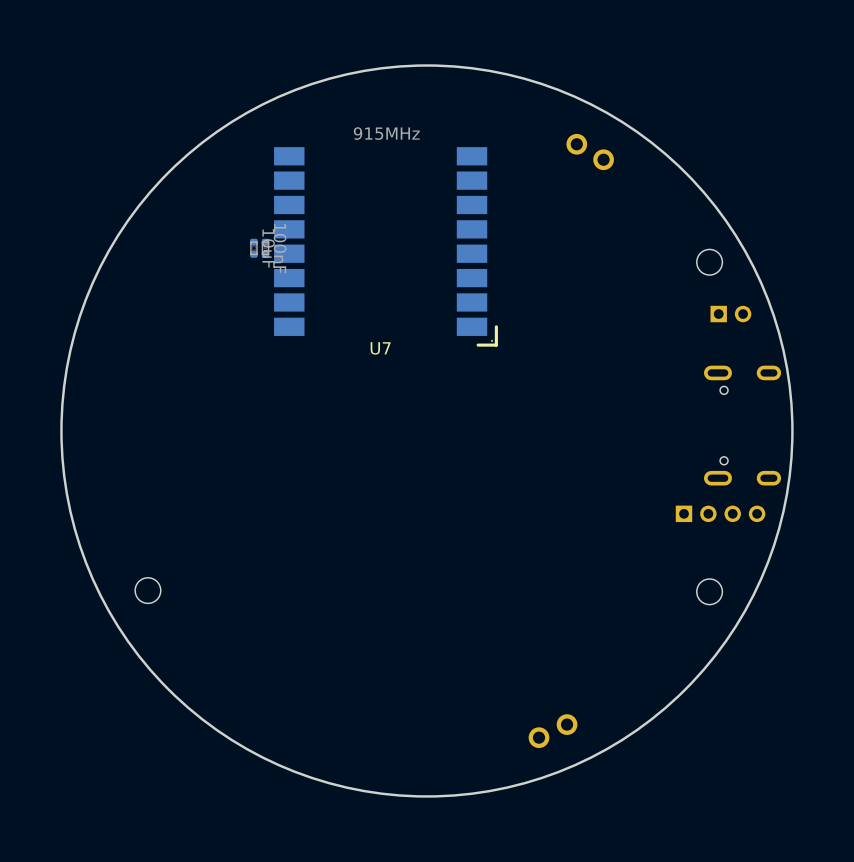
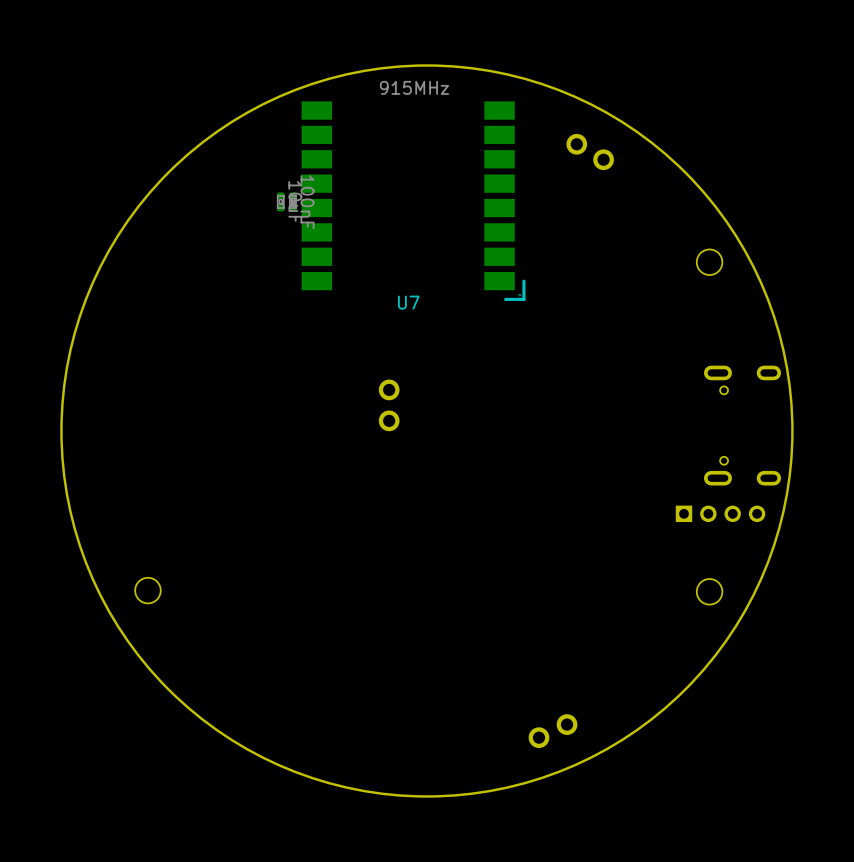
U7 position: (385, 246) -> (413, 201)
part position: (253, 248) -> (280, 201)
part position: (265, 248) -> (292, 201)
part: (730, 314) -> none
part: none -> (389, 405)

